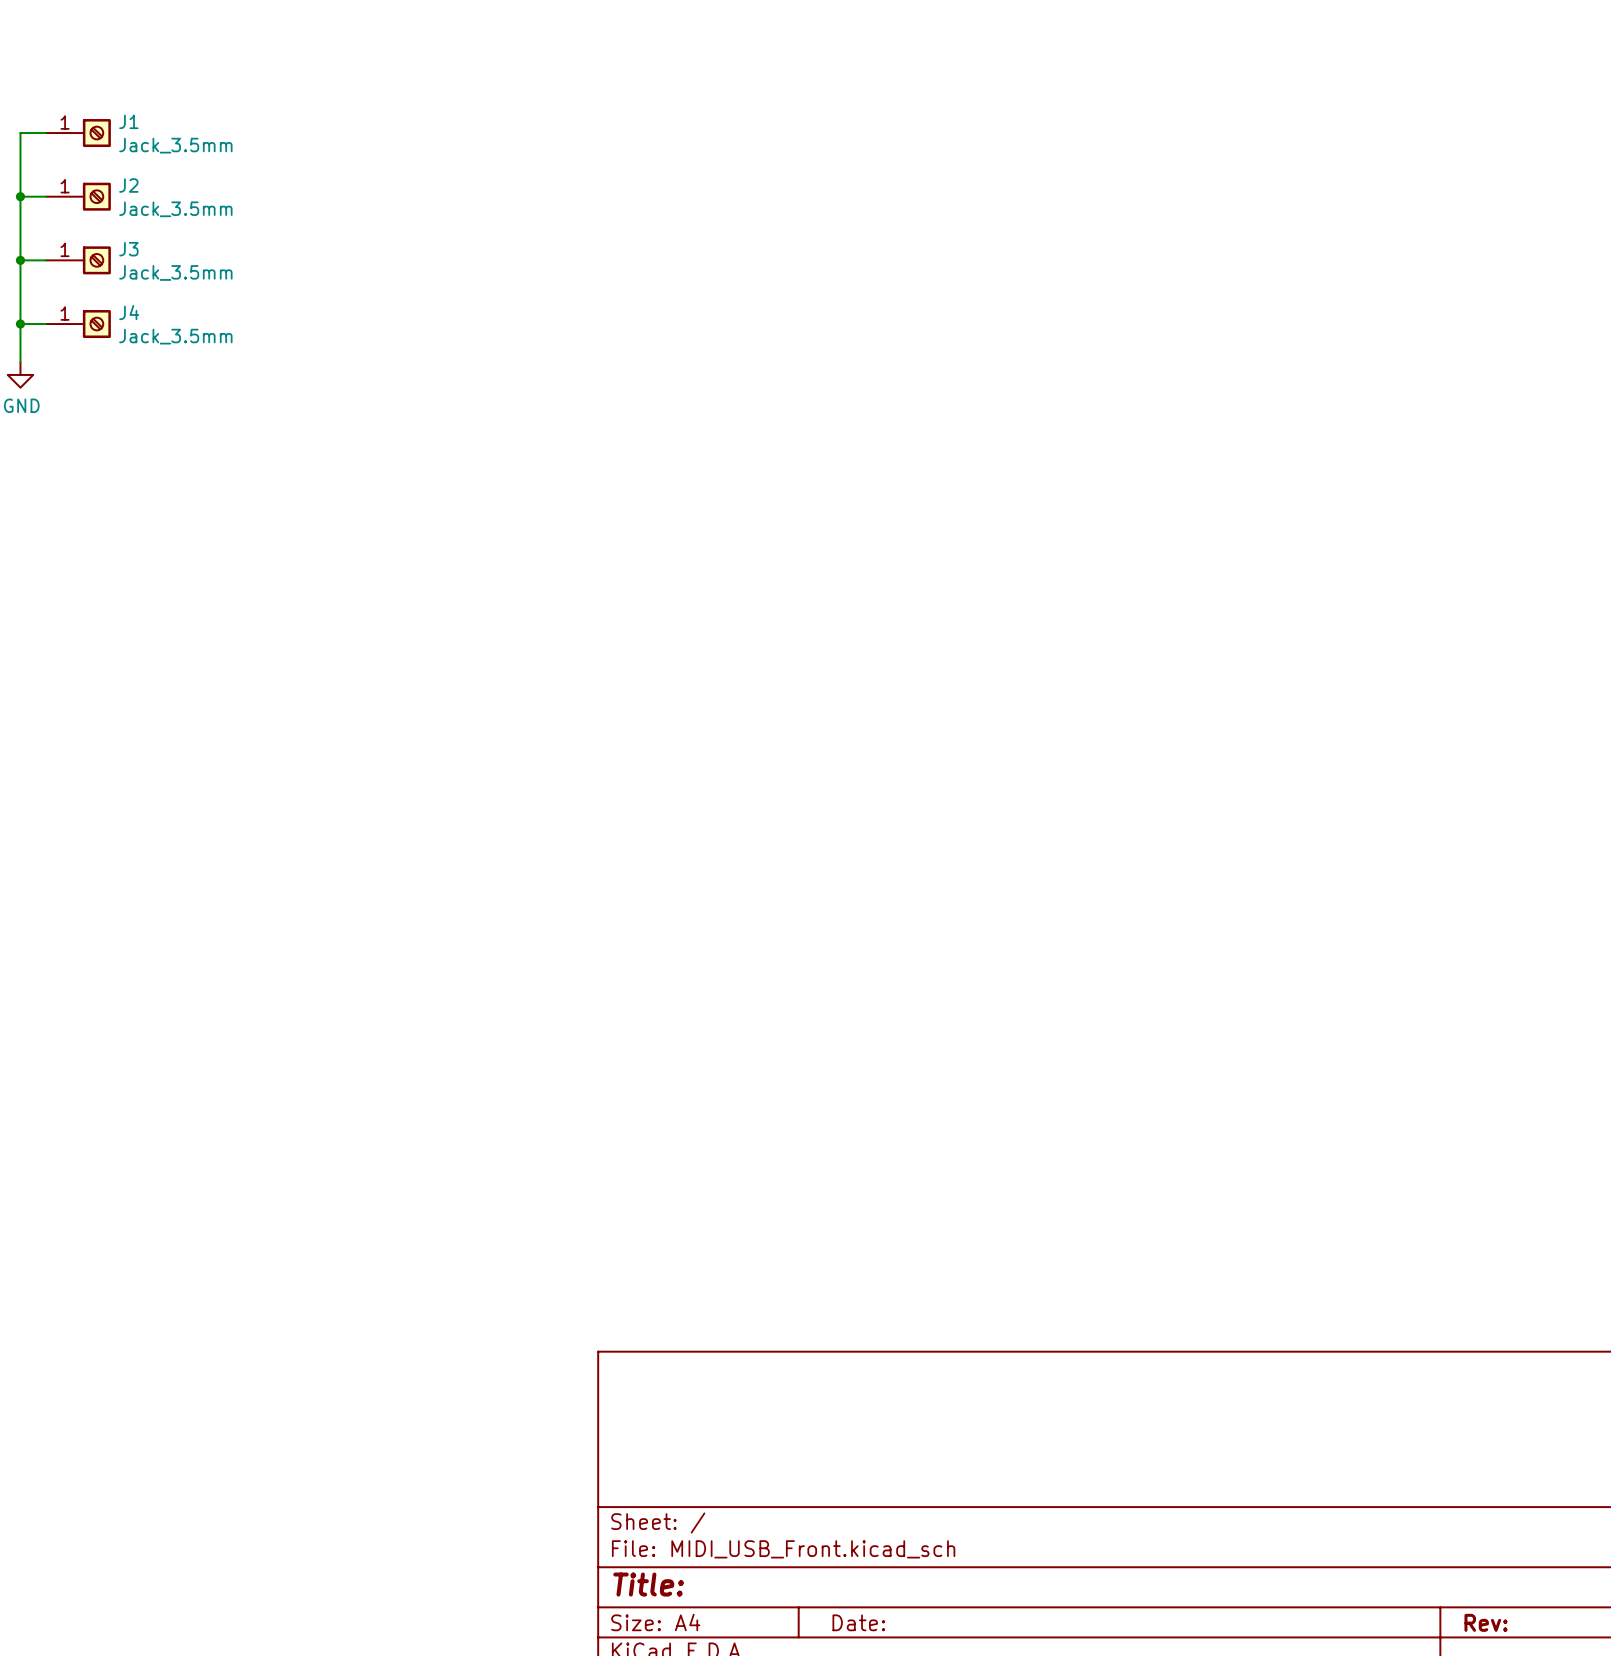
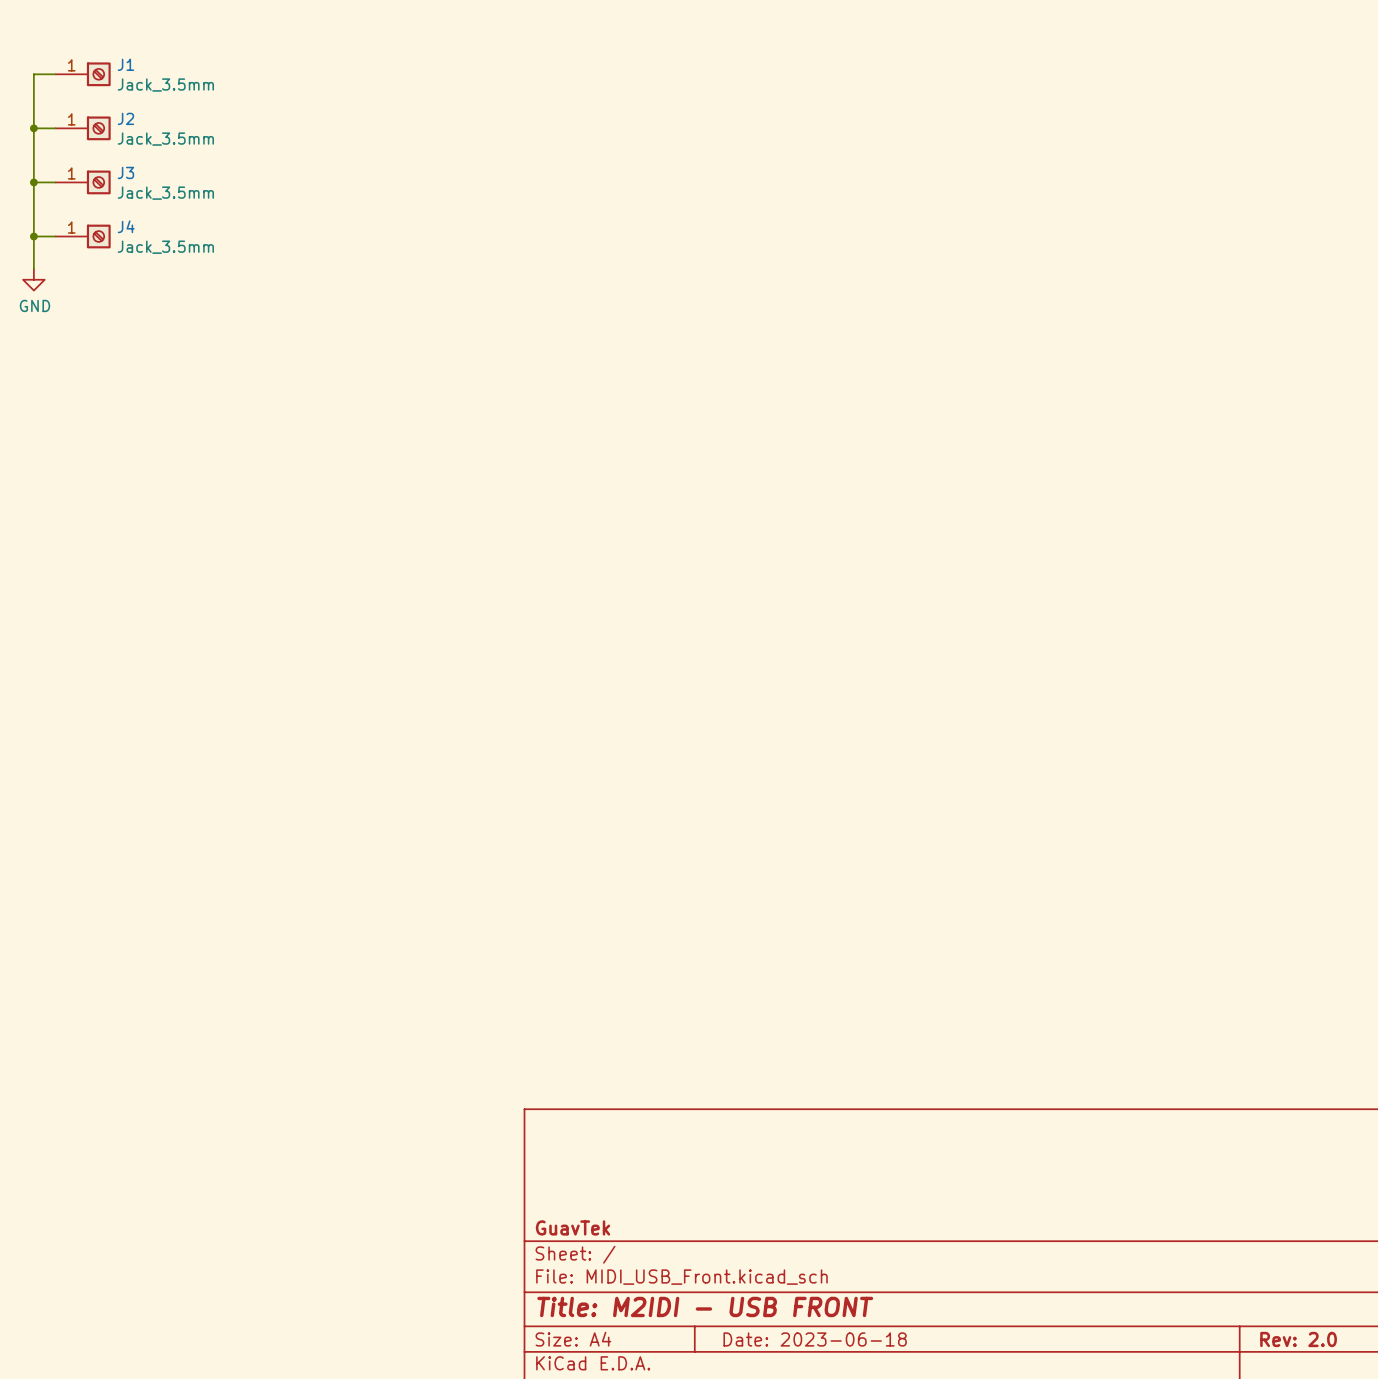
title block: none -> GuavTek (573, 1227)
title block: Title: (648, 1584) -> Title: M2IDI - USB FRONT (705, 1306)
title block: Date: (858, 1622) -> Date: 2023-06-18 (815, 1339)
title block: Rev: (1486, 1622) -> Rev: 2.0 (1298, 1339)

